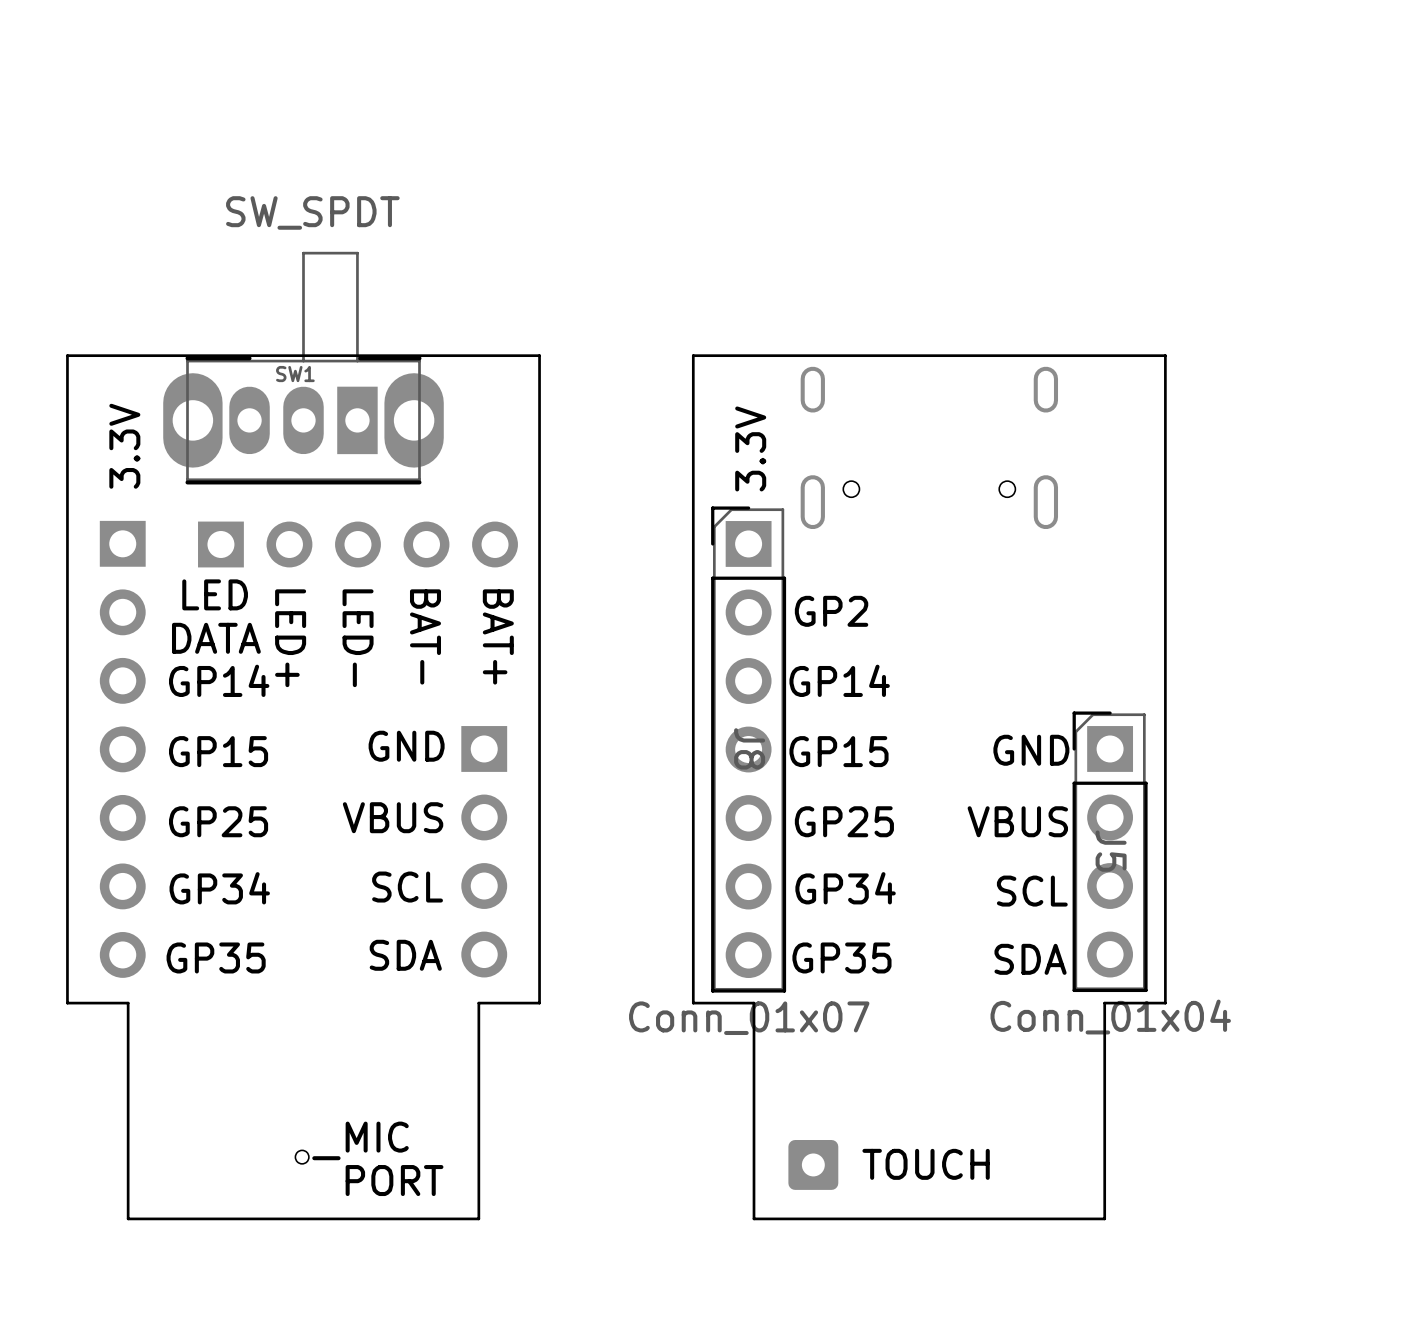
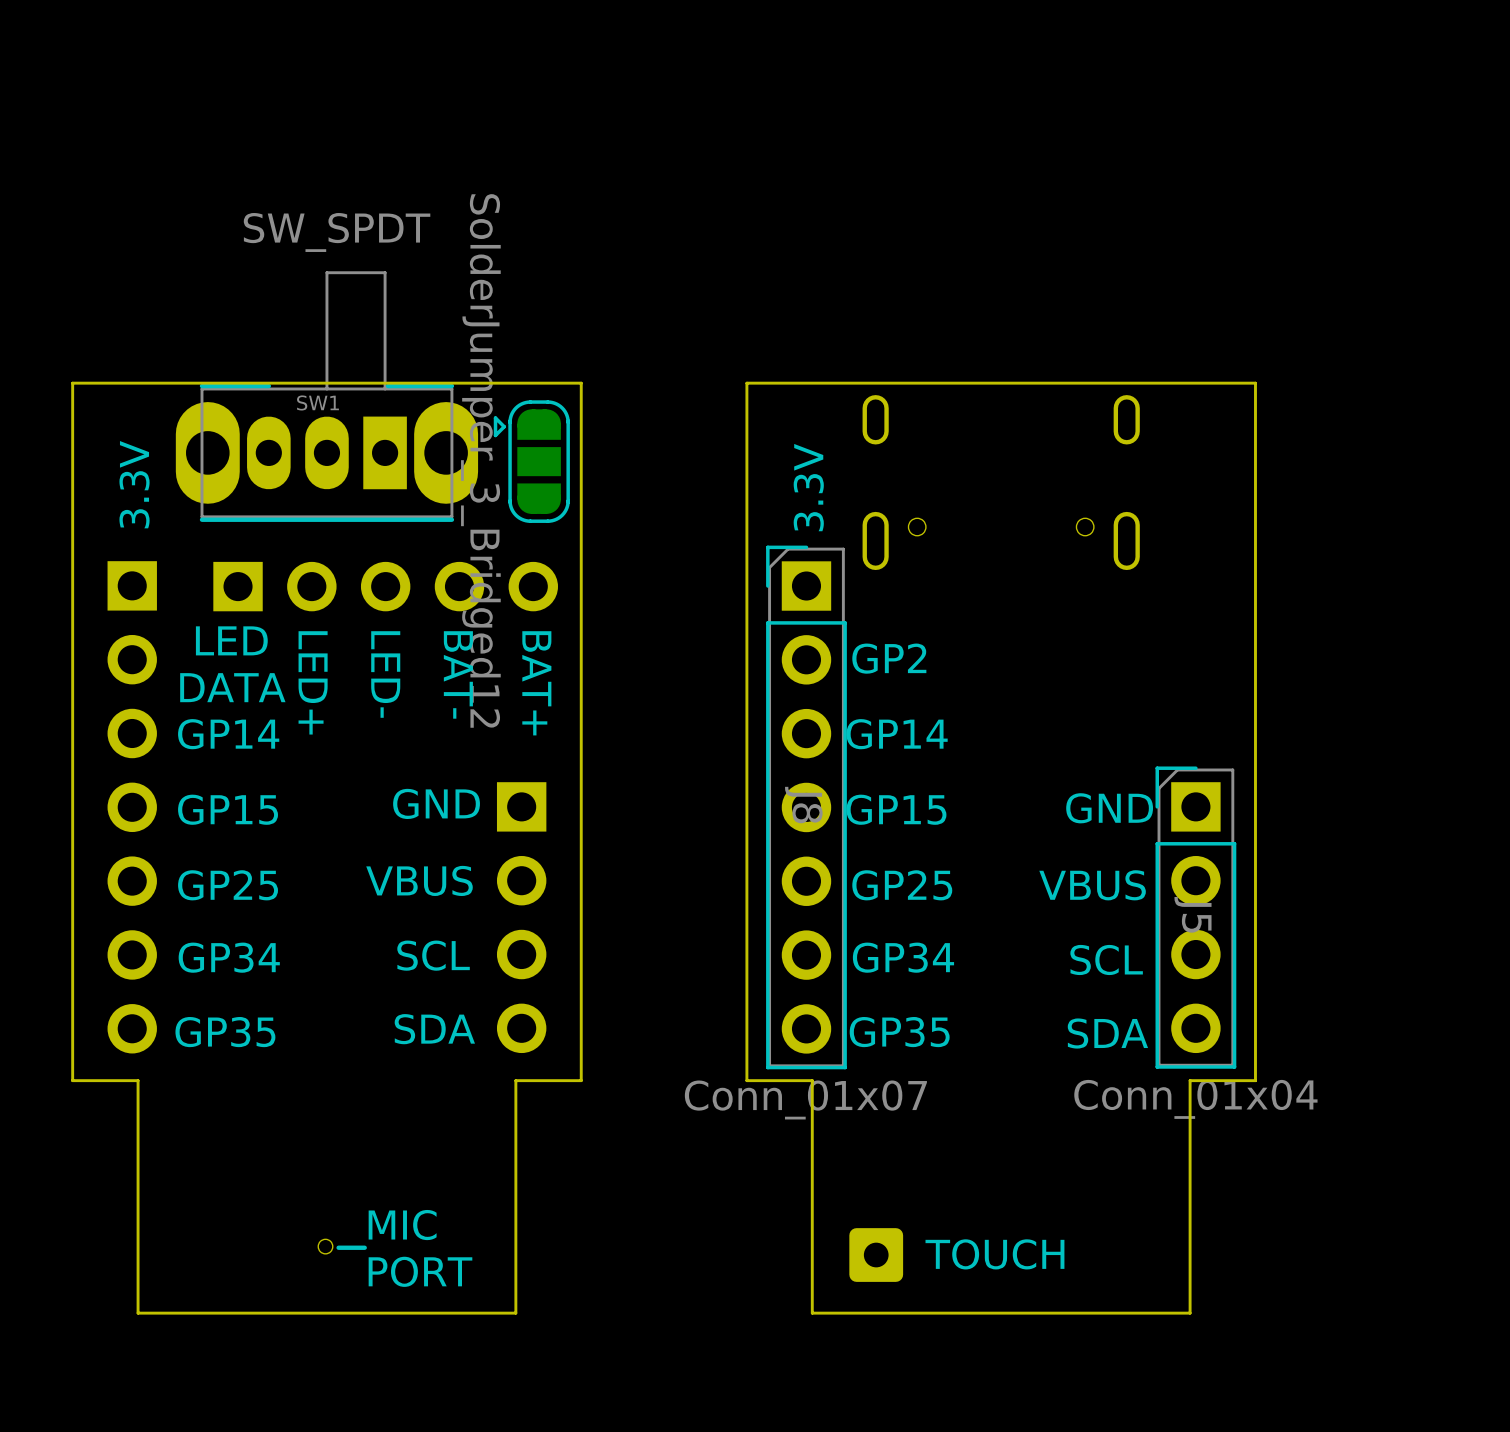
part: none -> SolderJumper_3_Bridged12 (531, 461)

